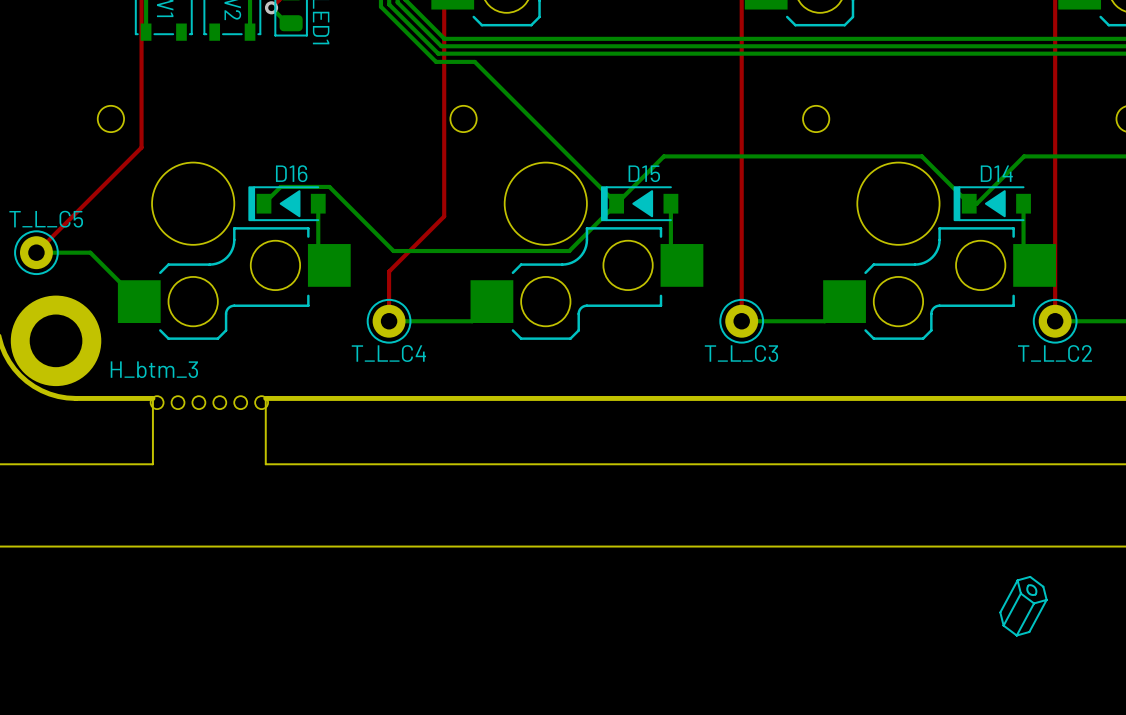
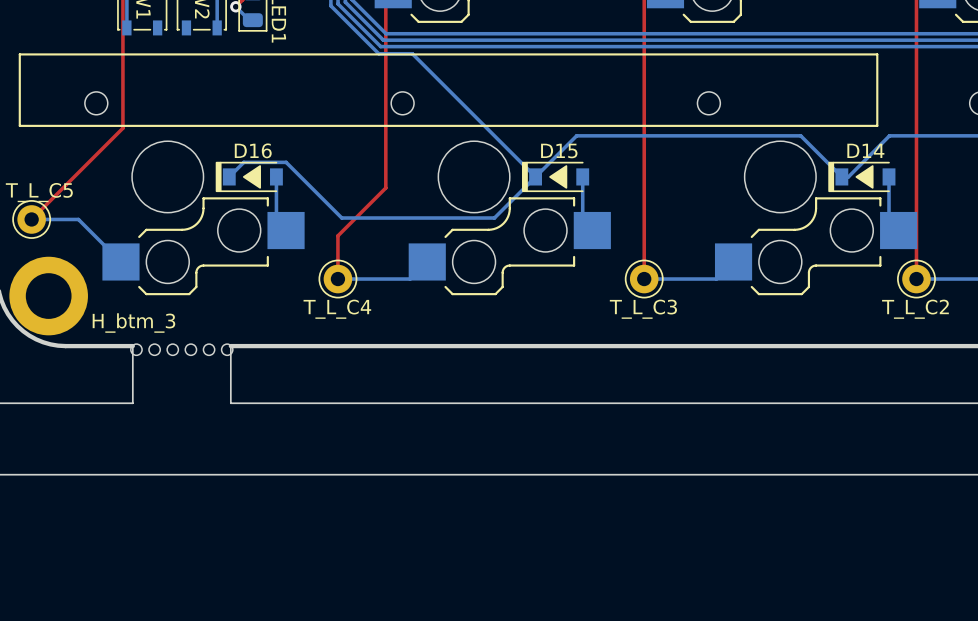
line: none -> (877, 54) (19, 54) (19, 125) (877, 125) (877, 54)
drawing: [999, 575, 1048, 637] -> none

